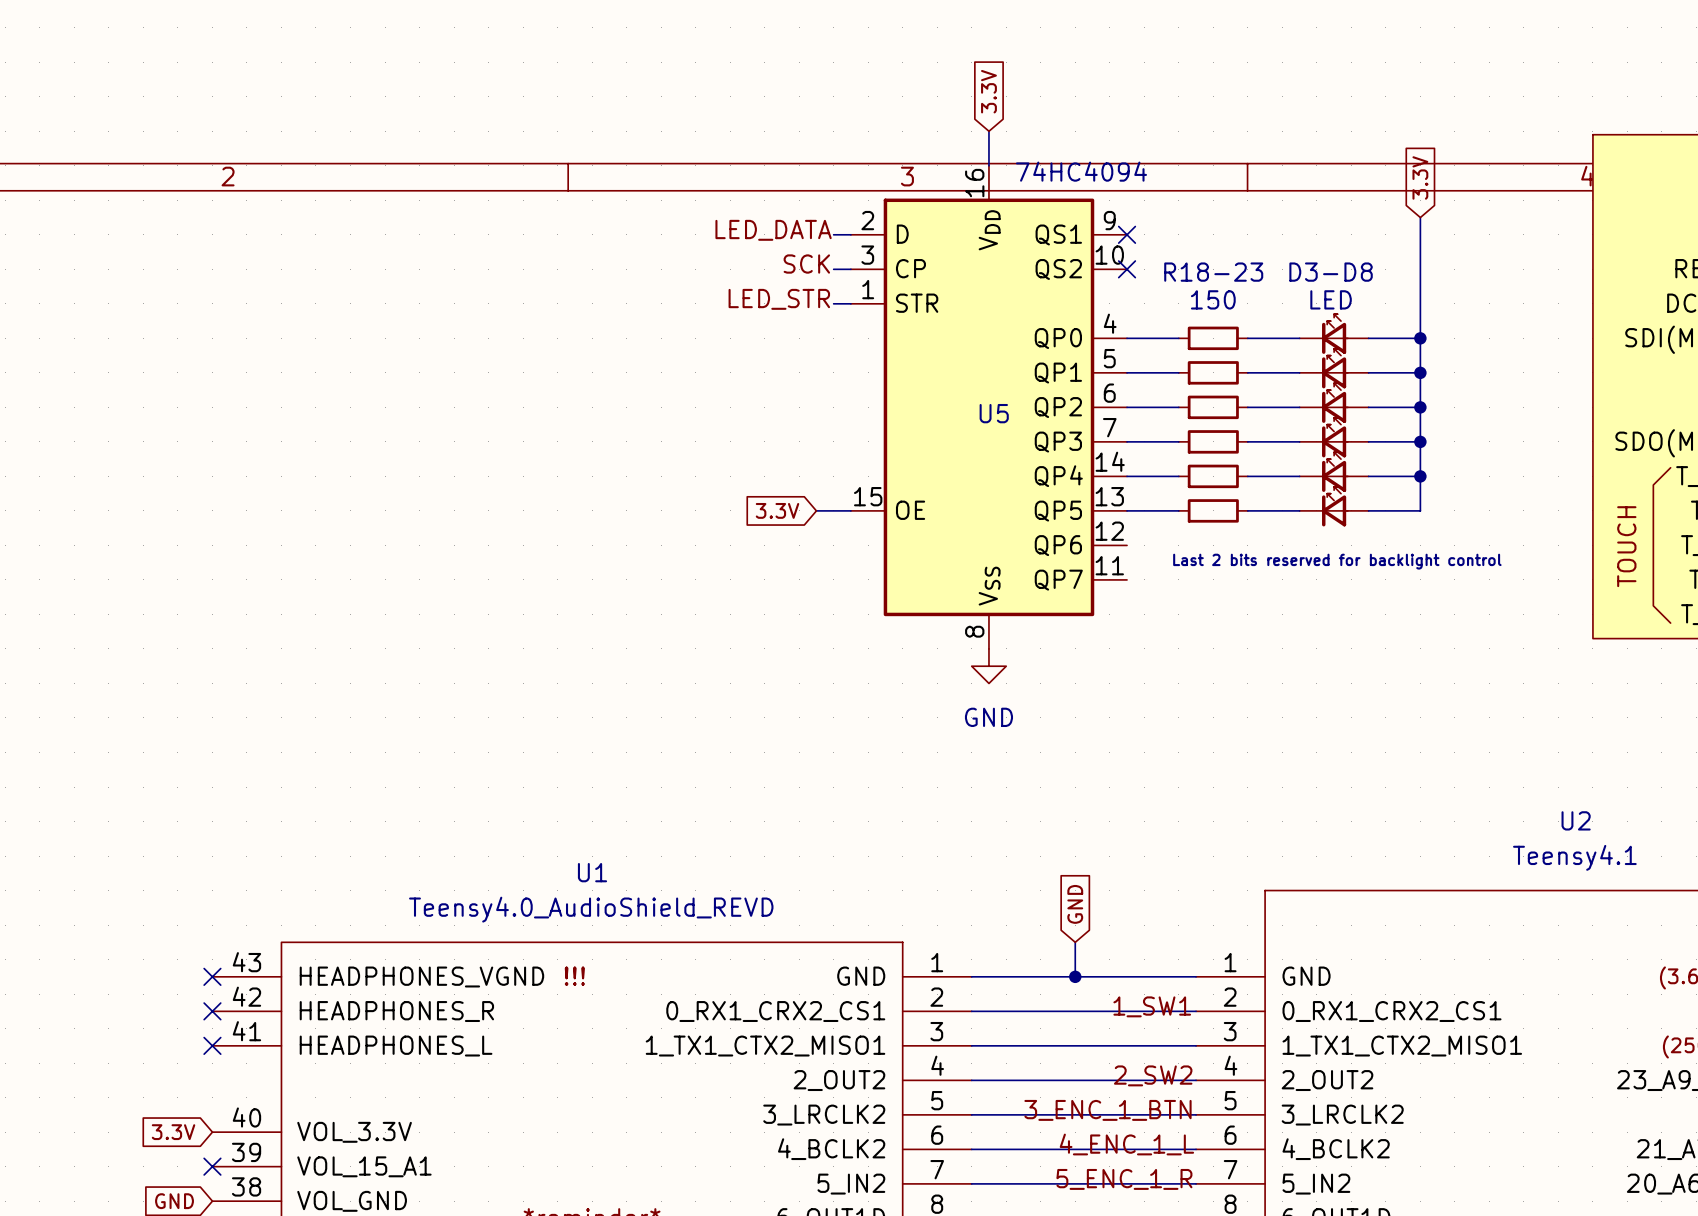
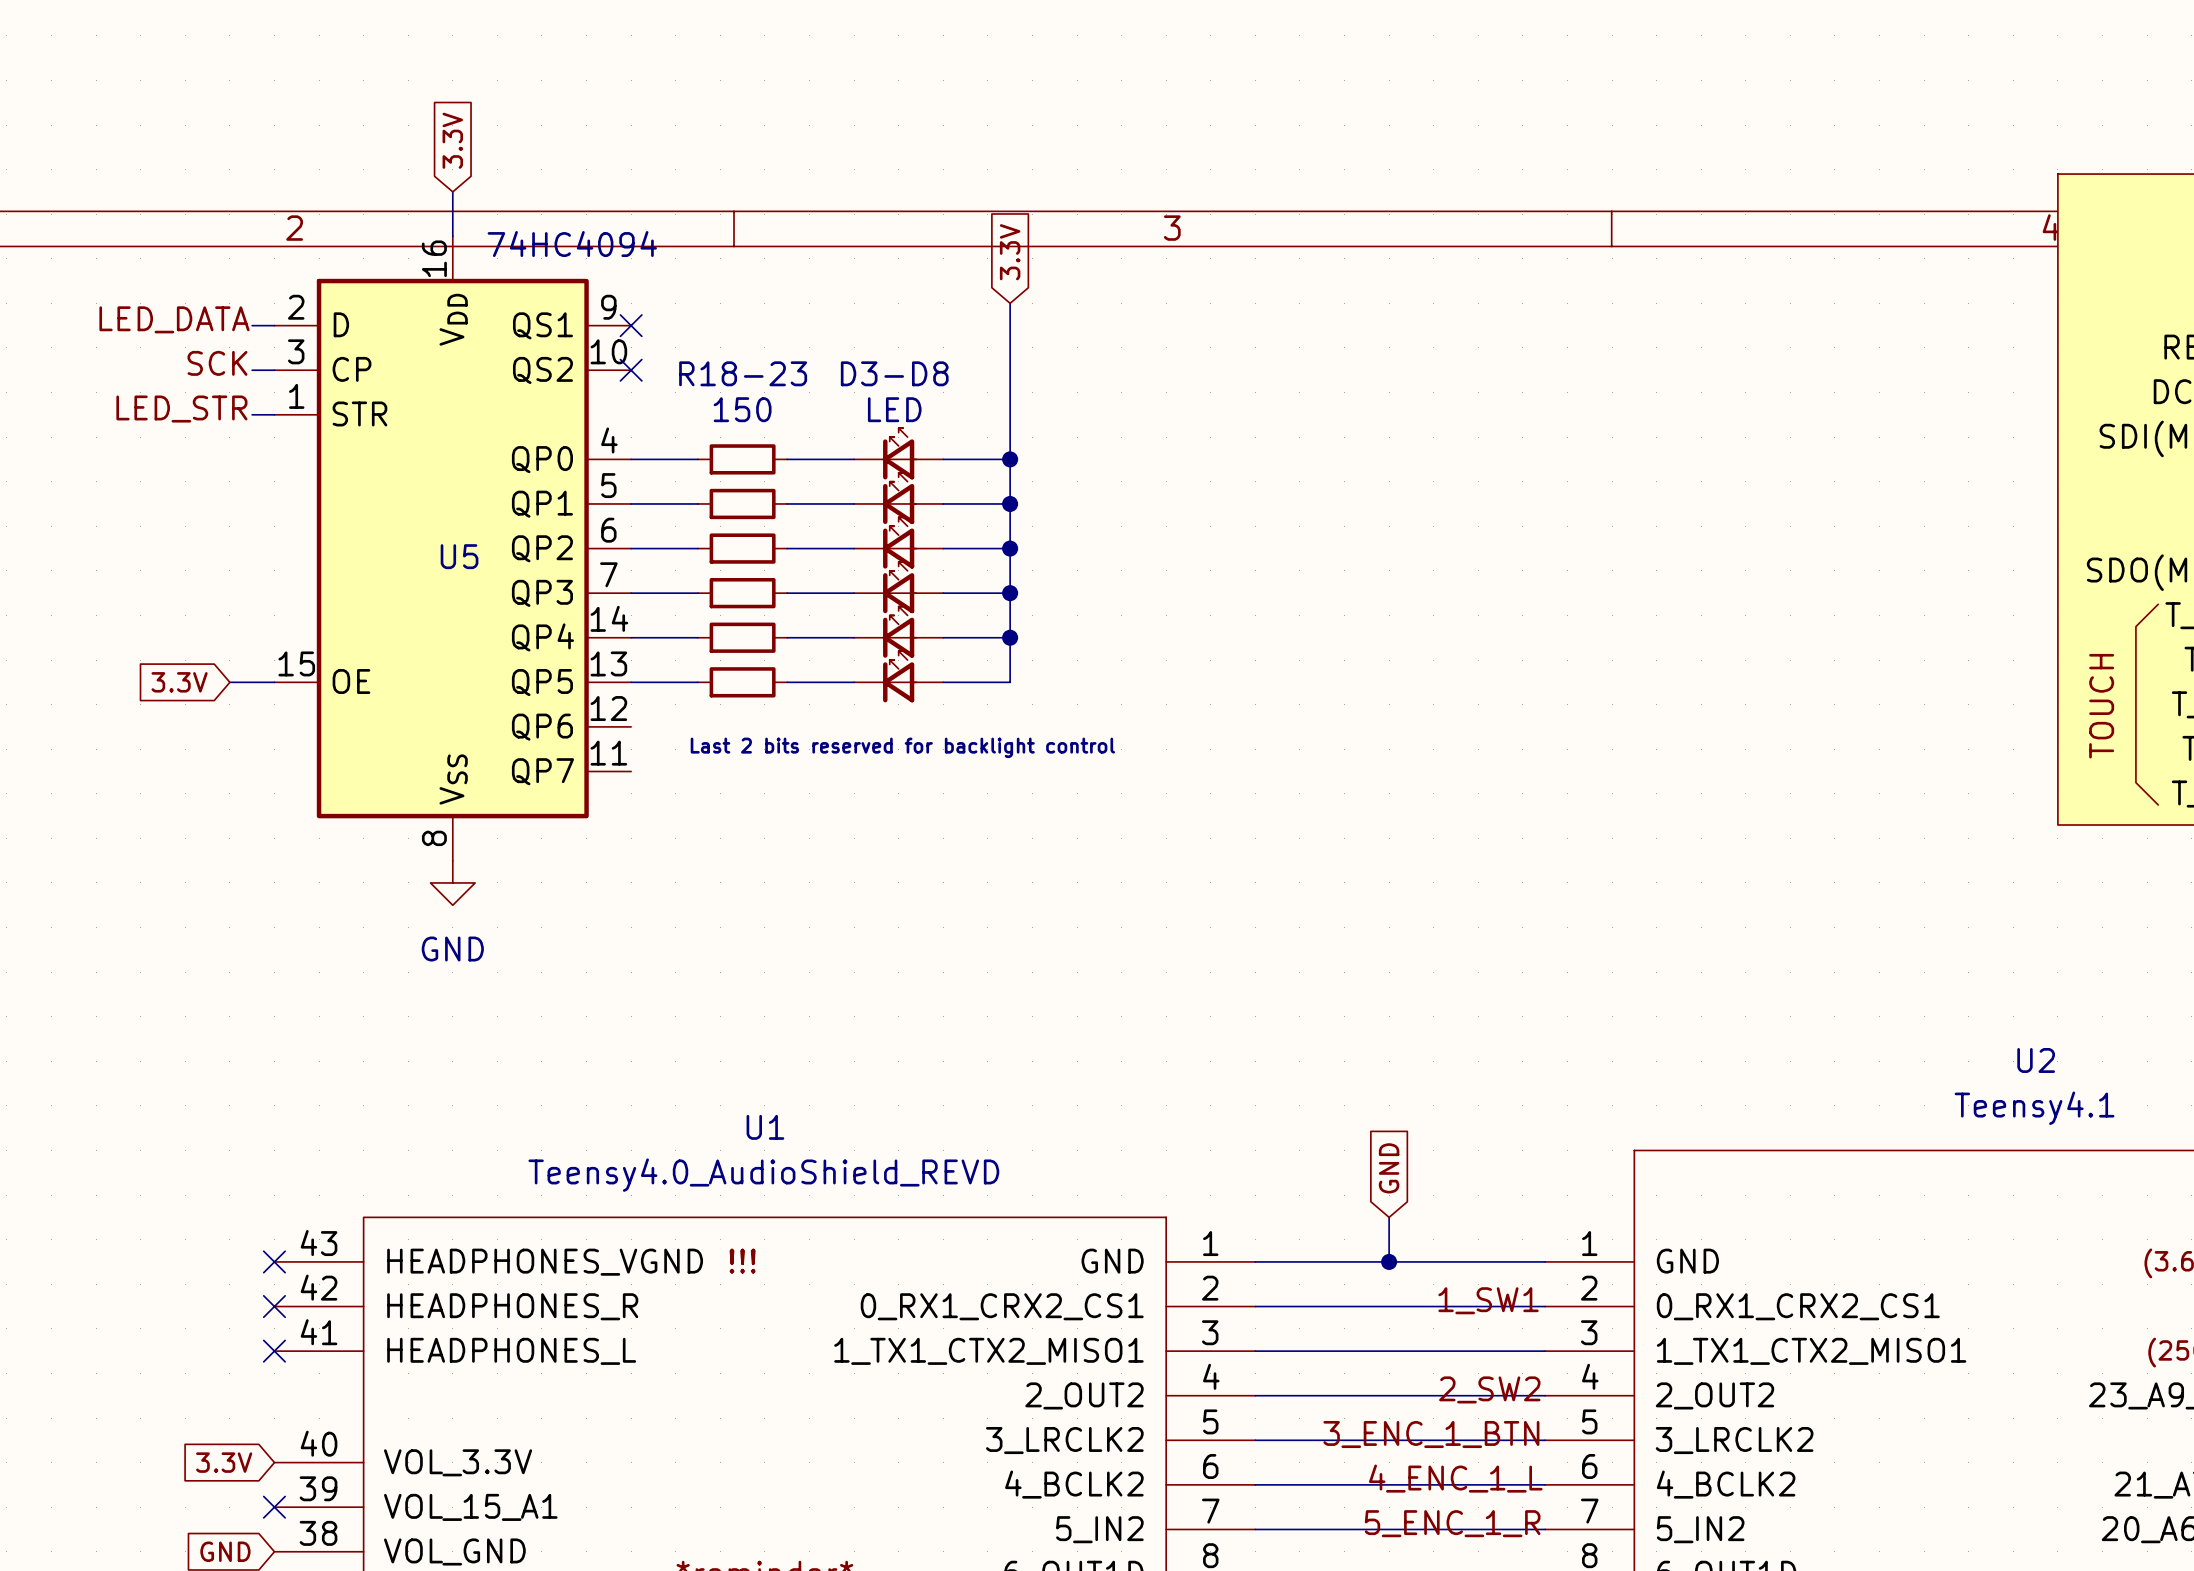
global label: 3.3V (988, 91) -> none
global label: none -> 3.3V (452, 140)
wire: (988, 131) (988, 165) -> none
wire: none -> (452, 191) (452, 236)
global label: 3.3V (1420, 177) -> none
global label: none -> 3.3V (1010, 252)
wire: (1420, 217) (1420, 510) (1368, 510) -> none
label: LED_DATA (773, 230) -> none
wire: none -> (1010, 303) (1010, 682) (943, 682)
wire: (833, 234) (850, 234) -> none
no-connect mark: (1127, 234) -> none
label: none -> LED_DATA (174, 319)
wire: none -> (252, 325) (274, 325)
no-connect mark: none -> (631, 325)
label: SCK (806, 264) -> none
wire: (833, 269) (850, 269) -> none
no-connect mark: (1127, 269) -> none
text: R18-23 (1213, 272) -> none
text: D3-D8 (1331, 272) -> none
label: none -> SCK (217, 363)
wire: none -> (252, 370) (274, 370)
no-connect mark: none -> (631, 370)
text: none -> R18-23 (743, 373)
text: none -> D3-D8 (894, 373)
label: LED_STR (779, 299) -> none
text: 150 (1213, 299) -> none
text: LED (1331, 299) -> none
wire: (833, 303) (850, 303) -> none
label: none -> LED_STR (181, 409)
text: none -> 150 (742, 409)
text: none -> LED (894, 409)
wire: none -> (252, 414) (274, 414)
part: (1334, 334) -> none
wire: (1127, 338) (1178, 338) -> none
part: (1213, 338) -> none
wire: (1247, 338) (1299, 338) -> none
wire: (1368, 338) (1420, 338) -> none
junction: (1420, 338) -> none
part: none -> (898, 453)
wire: none -> (631, 459) (698, 459)
part: none -> (742, 459)
wire: none -> (787, 459) (854, 459)
wire: none -> (943, 459) (1010, 459)
junction: none -> (1010, 459)
part: (1334, 368) -> none
wire: (1127, 372) (1178, 372) -> none
part: (1213, 372) -> none
wire: (1247, 372) (1299, 372) -> none
wire: (1368, 372) (1420, 372) -> none
junction: (1420, 372) -> none
part: none -> (898, 498)
wire: none -> (631, 503) (698, 503)
part: none -> (742, 503)
wire: none -> (787, 503) (854, 503)
wire: none -> (943, 503) (1010, 503)
junction: none -> (1010, 503)
part: (1334, 403) -> none
U5 position: (988, 407) -> (452, 548)
wire: (1127, 407) (1178, 407) -> none
part: (1213, 407) -> none
wire: (1247, 407) (1299, 407) -> none
wire: (1368, 407) (1420, 407) -> none
junction: (1420, 407) -> none
part: none -> (898, 543)
wire: none -> (631, 548) (698, 548)
part: none -> (742, 548)
wire: none -> (787, 548) (854, 548)
wire: none -> (943, 548) (1010, 548)
junction: none -> (1010, 548)
part: (1334, 437) -> none
wire: (1127, 441) (1178, 441) -> none
part: (1213, 441) -> none
wire: (1247, 441) (1299, 441) -> none
wire: (1368, 441) (1420, 441) -> none
junction: (1420, 441) -> none
part: none -> (898, 587)
wire: none -> (631, 593) (698, 593)
part: none -> (742, 593)
wire: none -> (787, 593) (854, 593)
wire: none -> (943, 593) (1010, 593)
junction: none -> (1010, 593)
part: (1334, 472) -> none
wire: (1127, 476) (1178, 476) -> none
part: (1213, 476) -> none
wire: (1247, 476) (1299, 476) -> none
wire: (1368, 476) (1420, 476) -> none
junction: (1420, 476) -> none
part: none -> (898, 632)
wire: none -> (631, 637) (698, 637)
part: none -> (742, 637)
wire: none -> (787, 637) (854, 637)
wire: none -> (943, 637) (1010, 637)
junction: none -> (1010, 637)
part: (1334, 506) -> none
global label: 3.3V (777, 510) -> none
wire: (816, 510) (850, 510) -> none
wire: (1127, 510) (1178, 510) -> none
part: (1213, 510) -> none
wire: (1247, 510) (1299, 510) -> none
part: none -> (898, 676)
global label: none -> 3.3V (179, 682)
wire: none -> (229, 682) (274, 682)
wire: none -> (631, 682) (698, 682)
part: none -> (742, 682)
wire: none -> (787, 682) (854, 682)
text: Last 2 bits reserved for backlight control (1337, 561) -> none
text: none -> Last 2 bits reserved for backlight control (902, 747)
power symbol: GND (988, 666) -> none
power symbol: none -> GND (452, 882)

